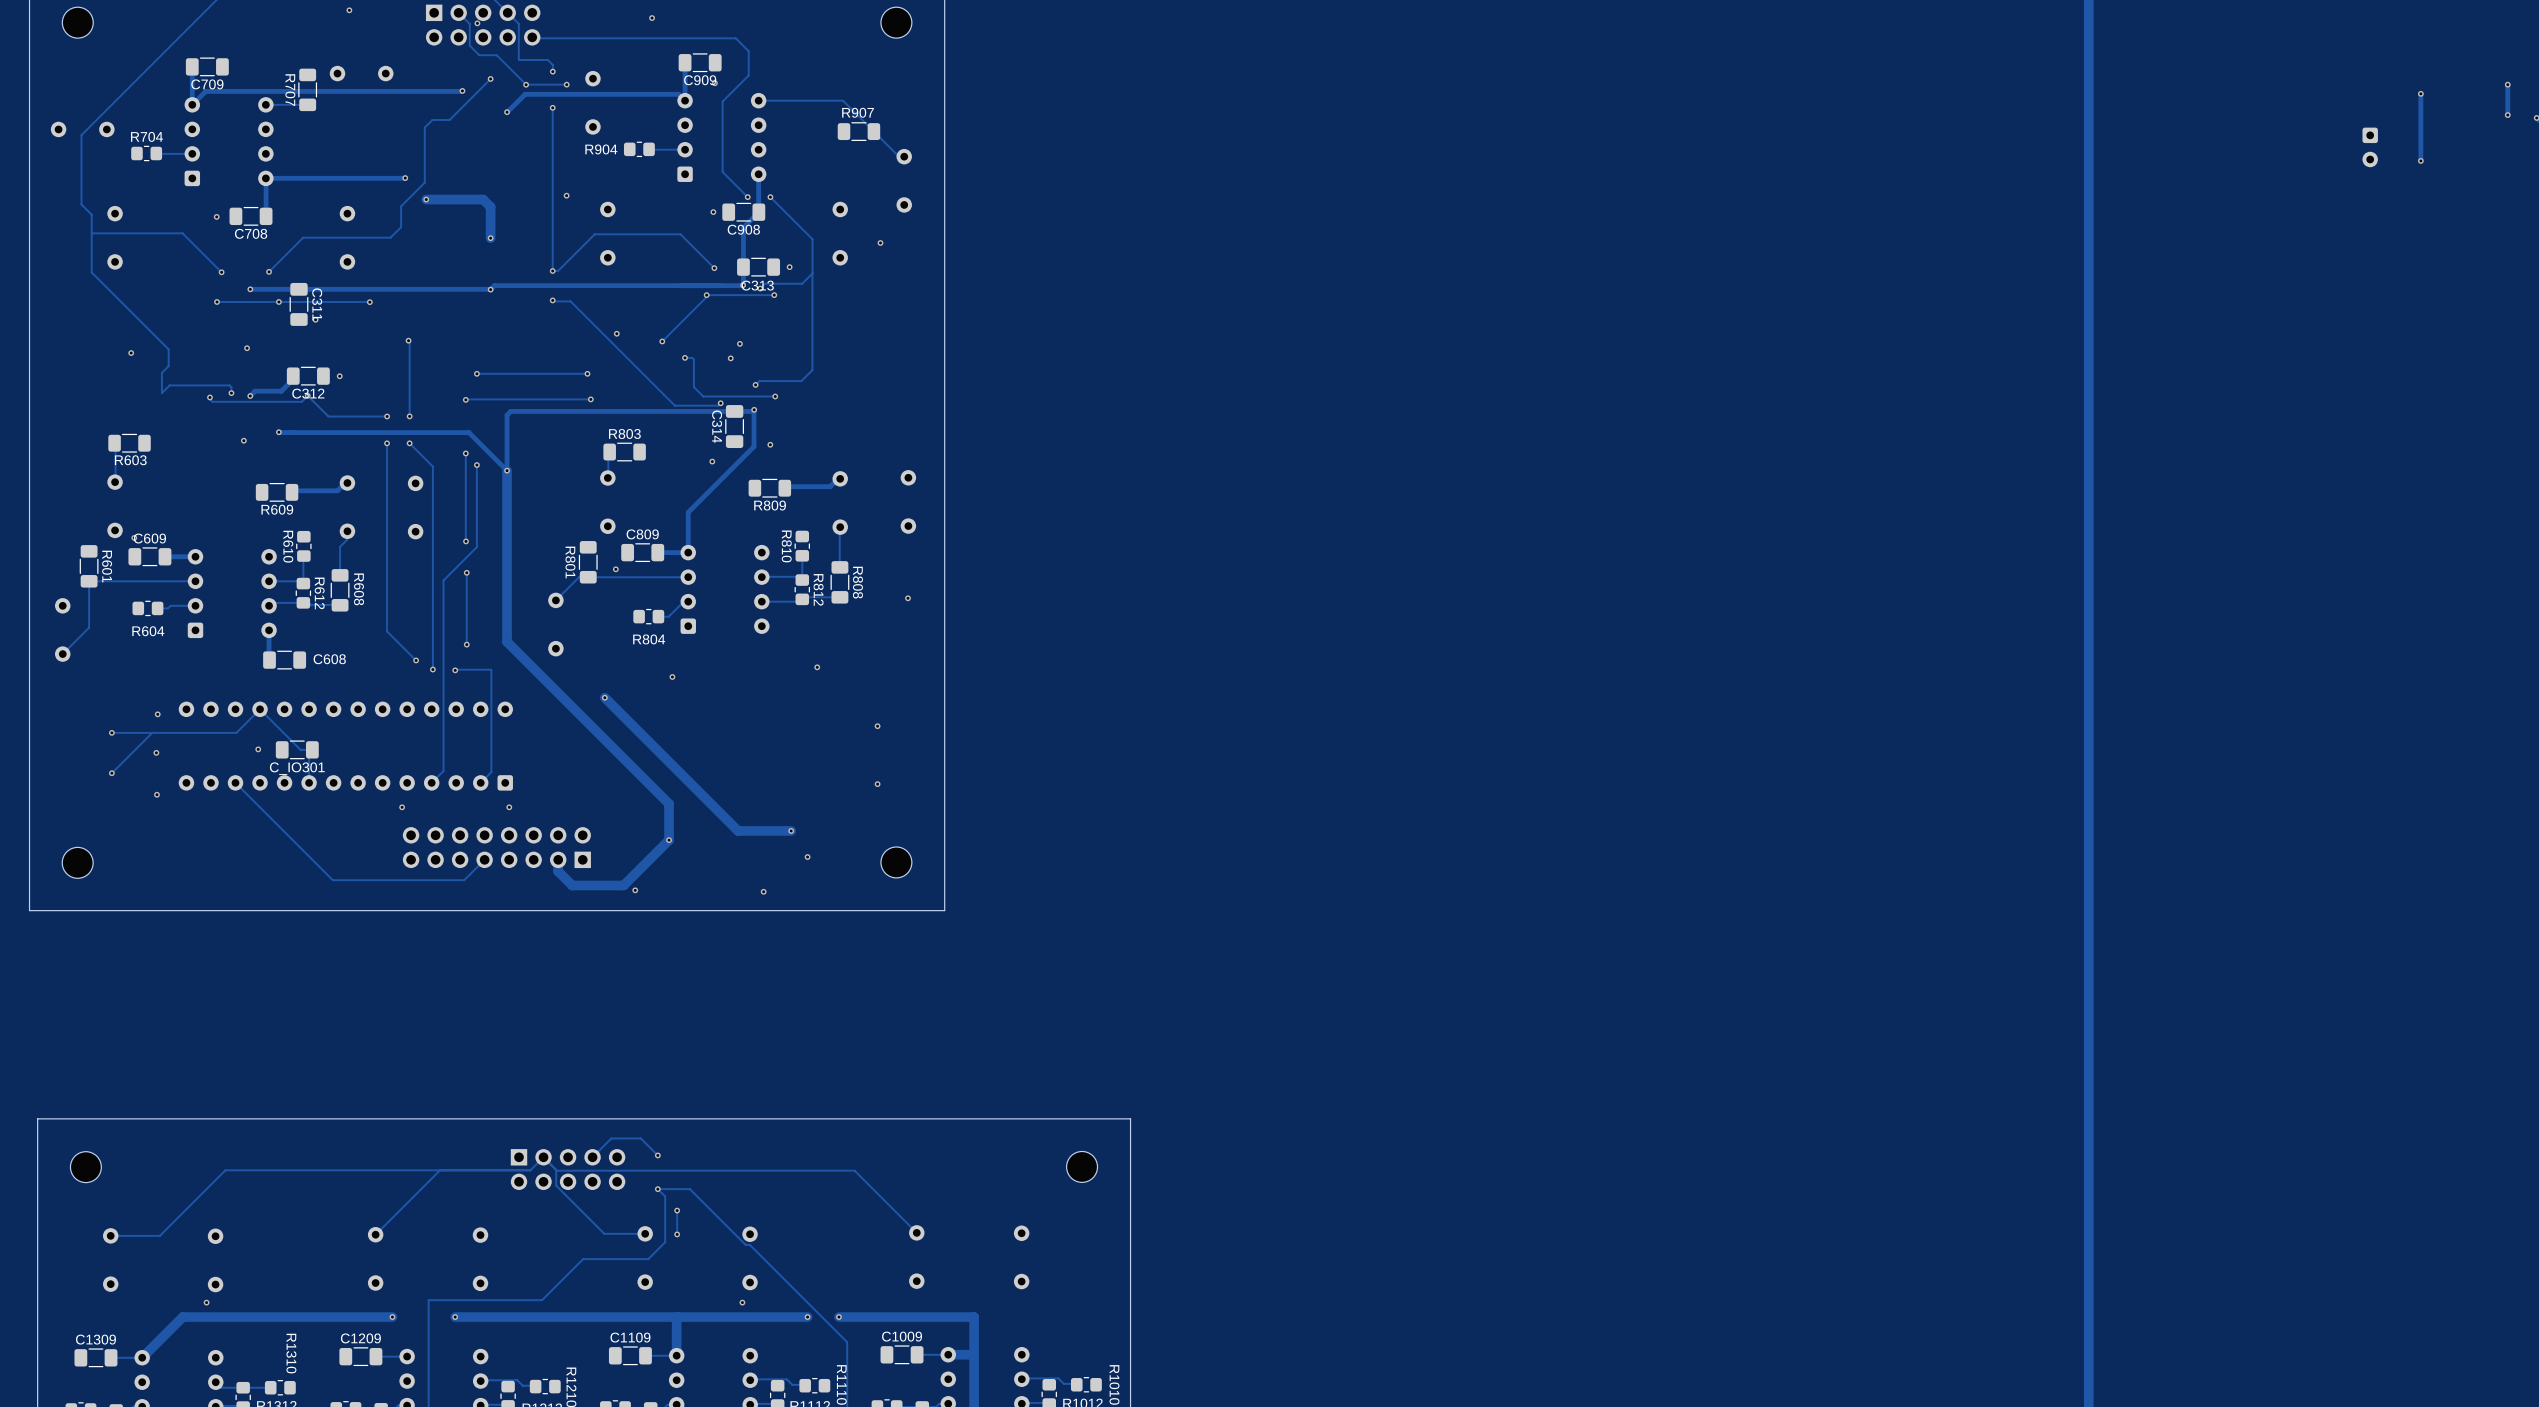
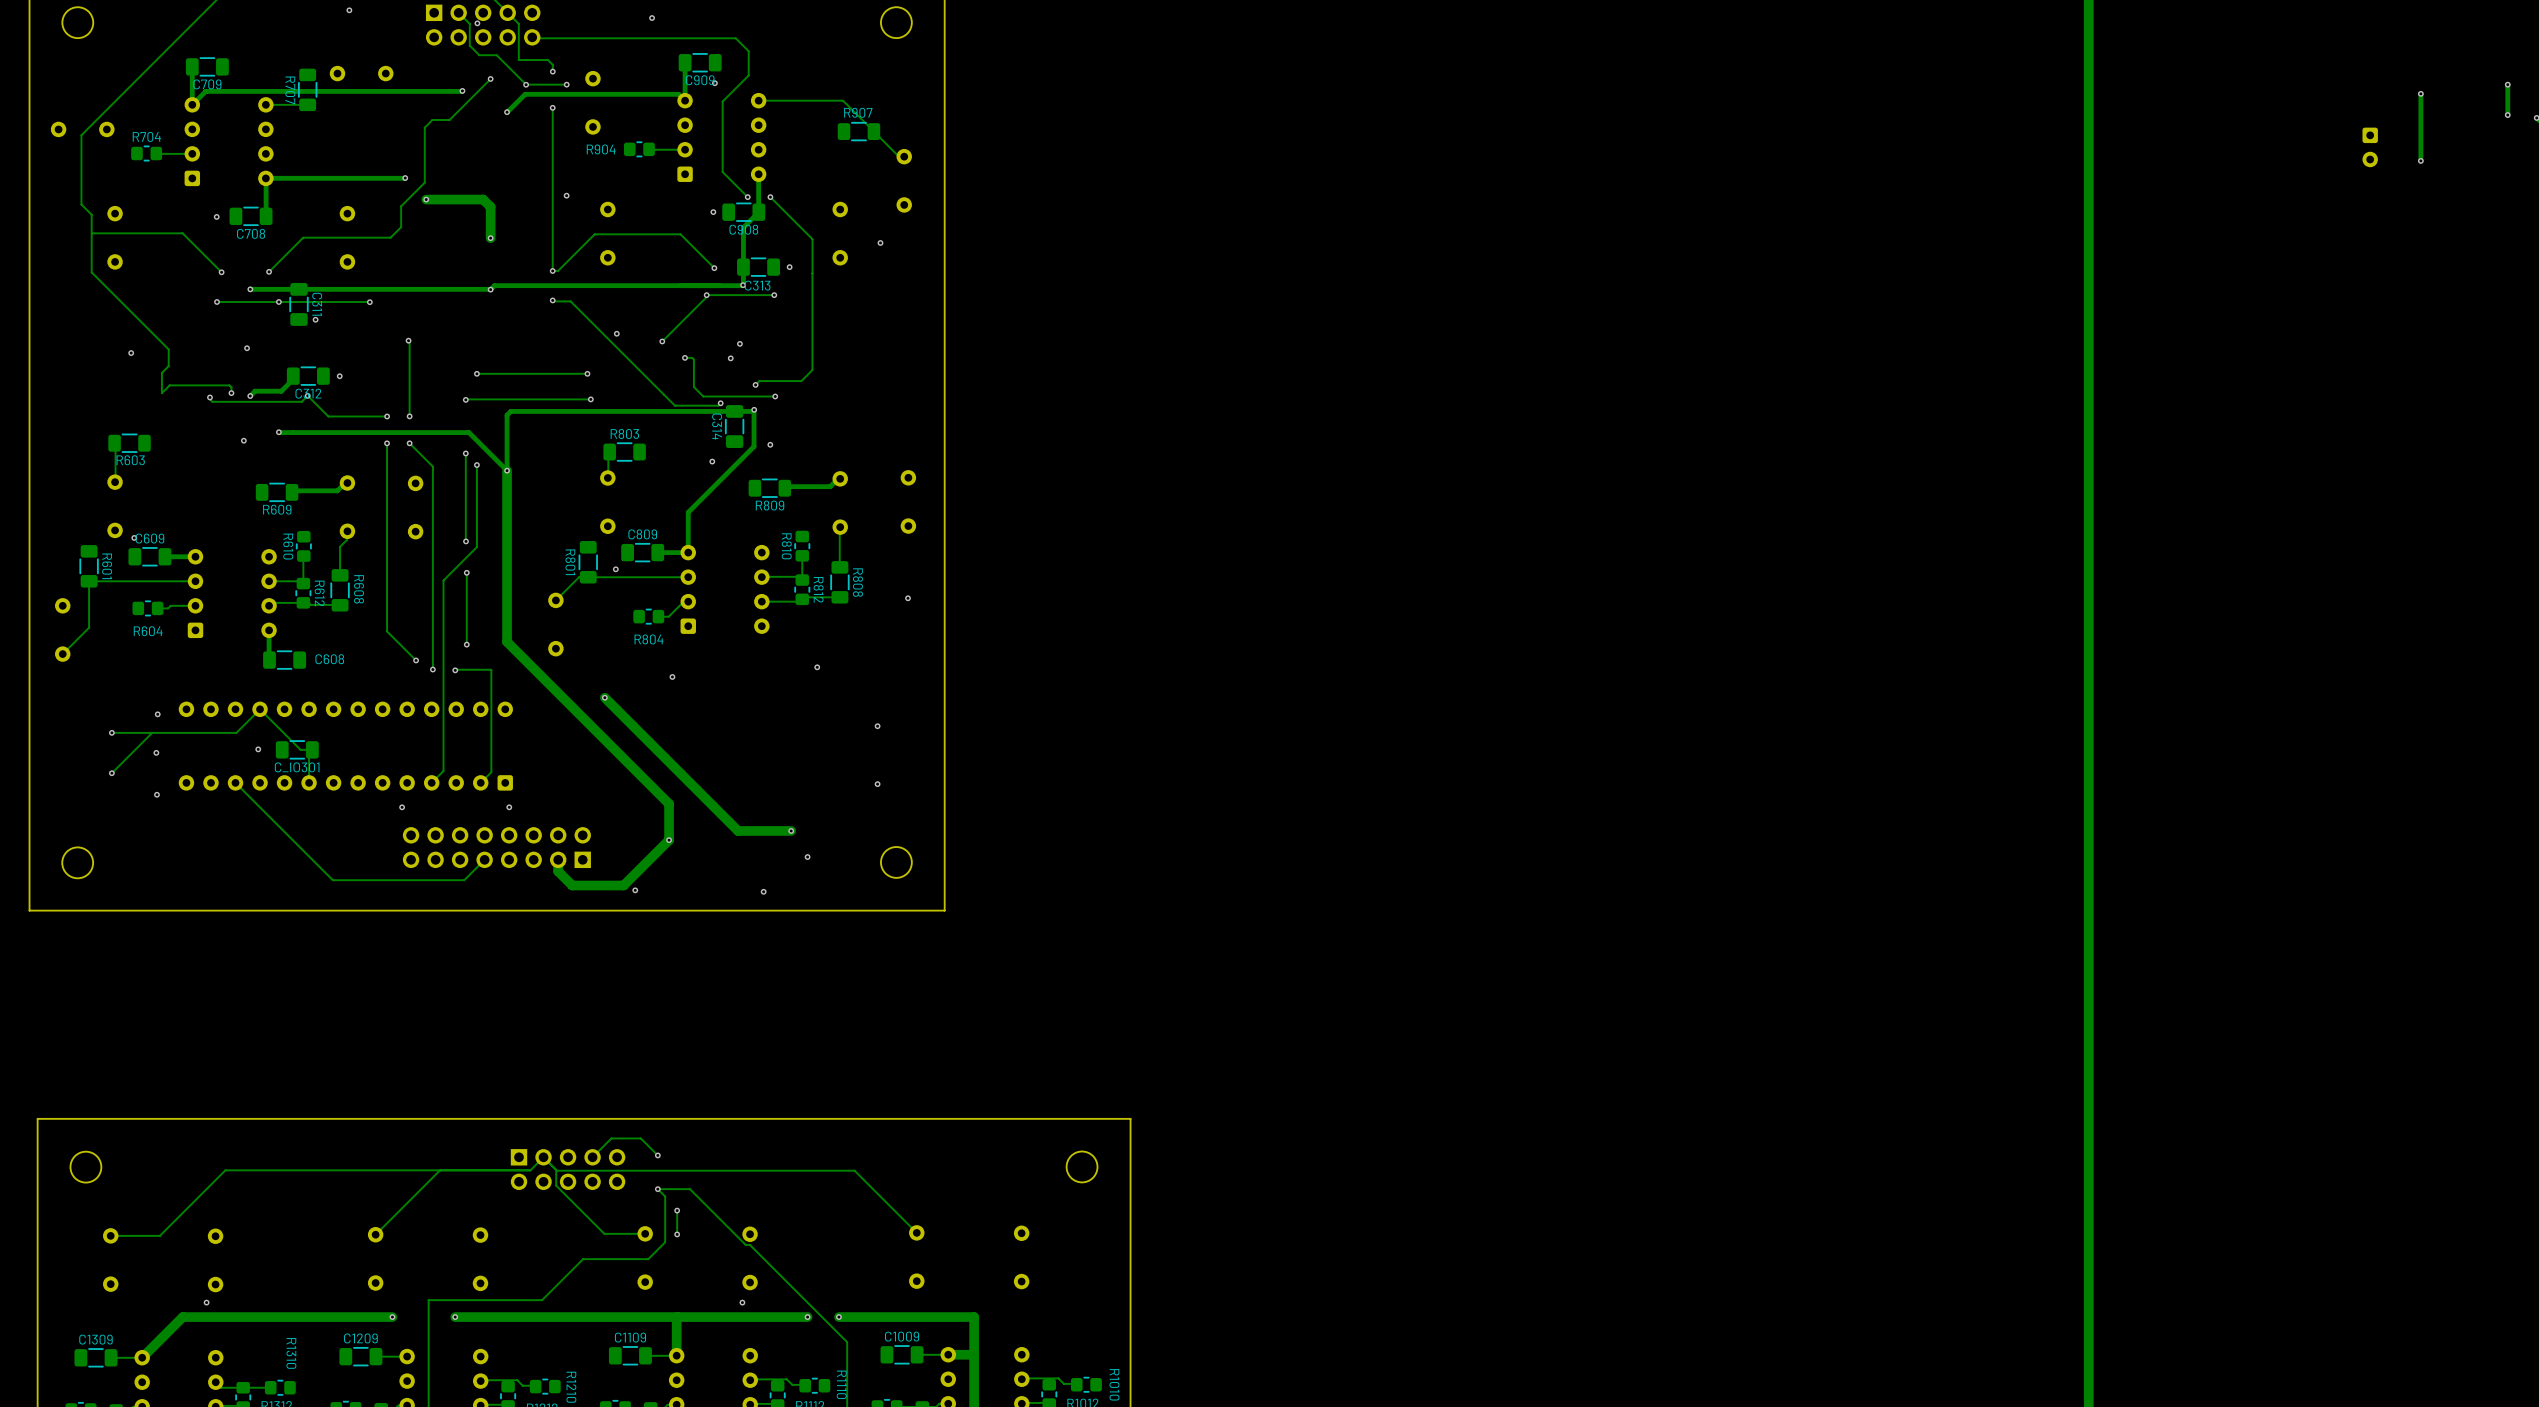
track: (812, 273) (802, 283) (765, 283) (760, 288) -> none
via: (760, 288) -> none

